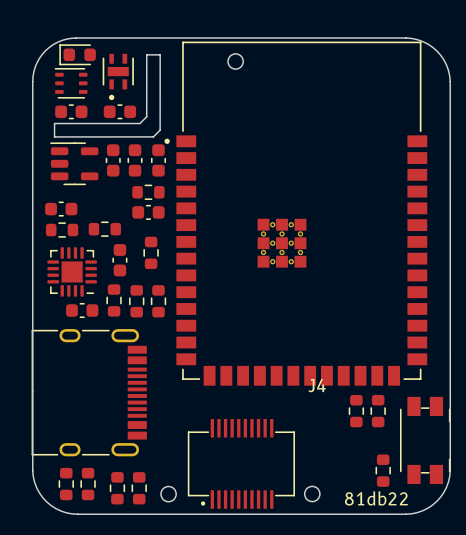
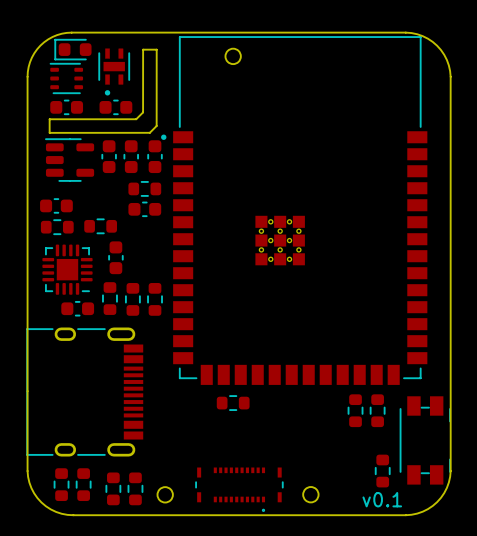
part rotation: 0° (151, 252) -> 90° clockwise (233, 403)
part position: (151, 252) -> (233, 403)
J4: (241, 463) -> none
part: none -> (239, 489)
text: 81db22 (376, 498) -> v0.1 (382, 499)

